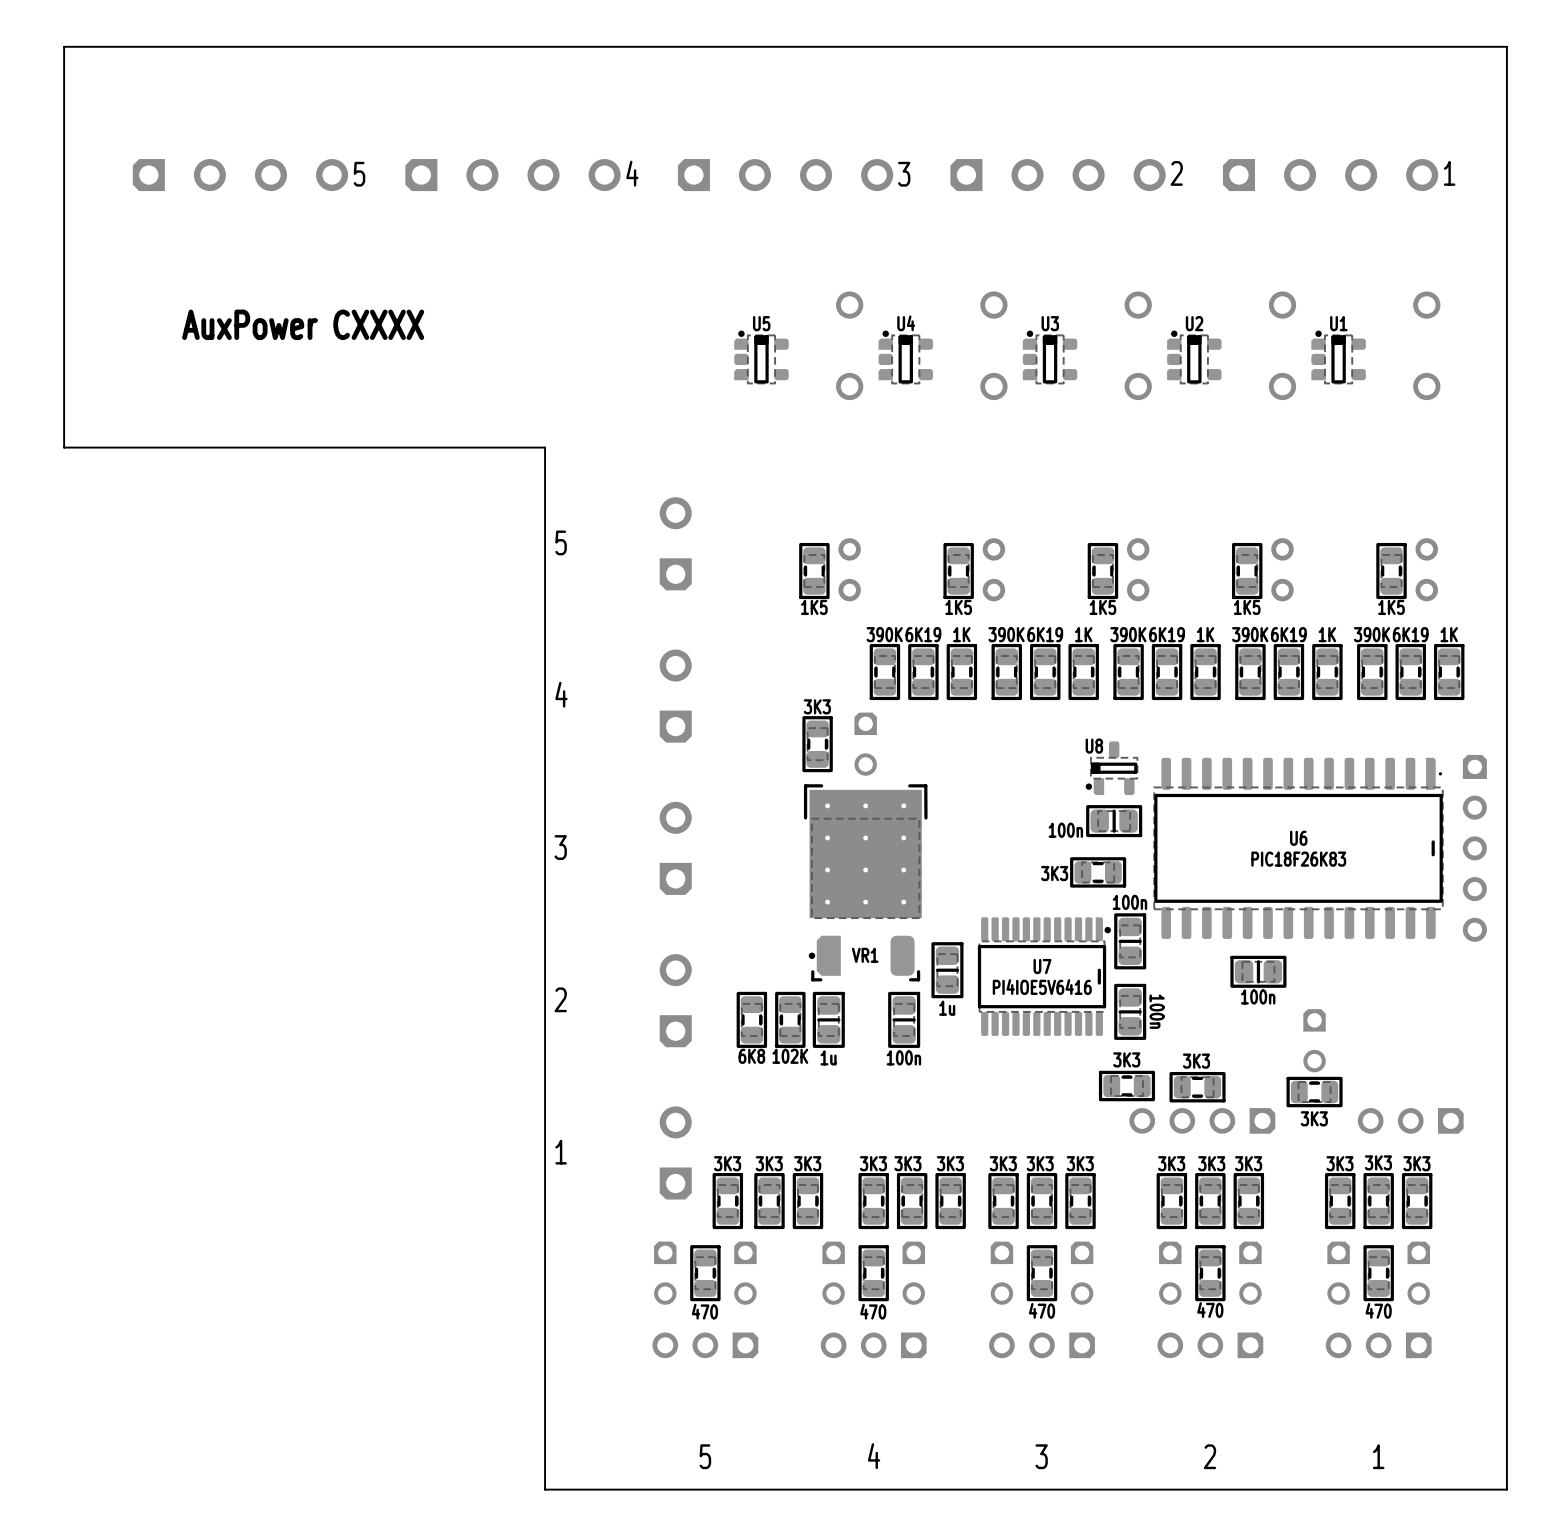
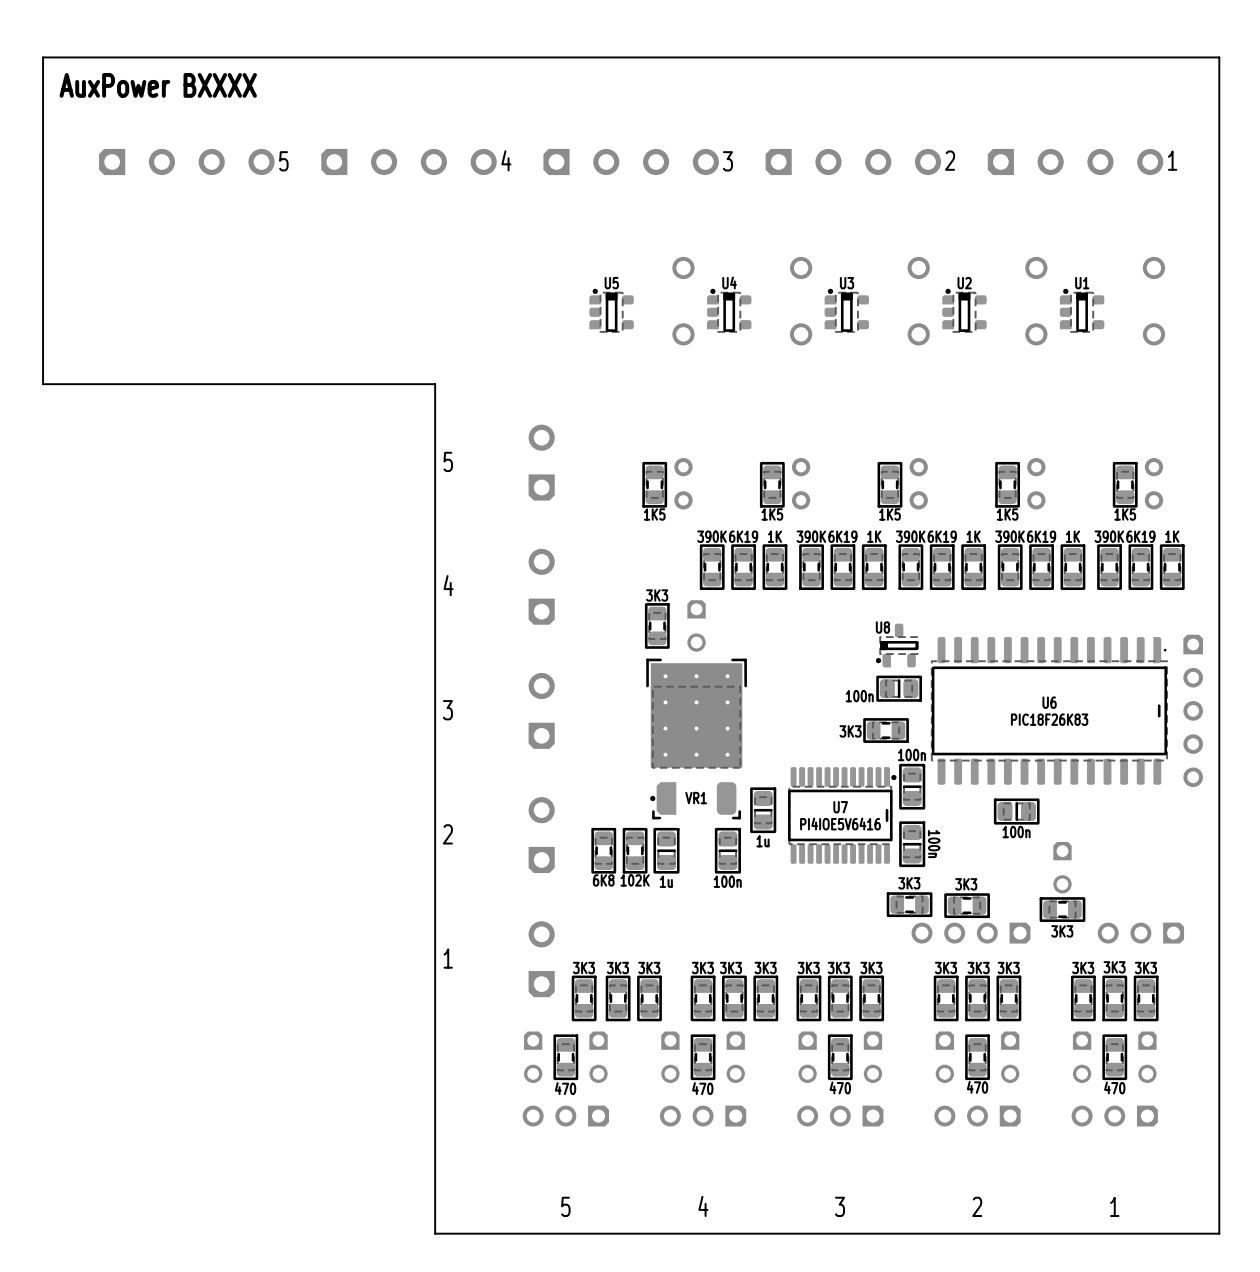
text: none -> AuxPower BXXXX (158, 85)
text: AuxPower CXXXX (303, 324) -> none

